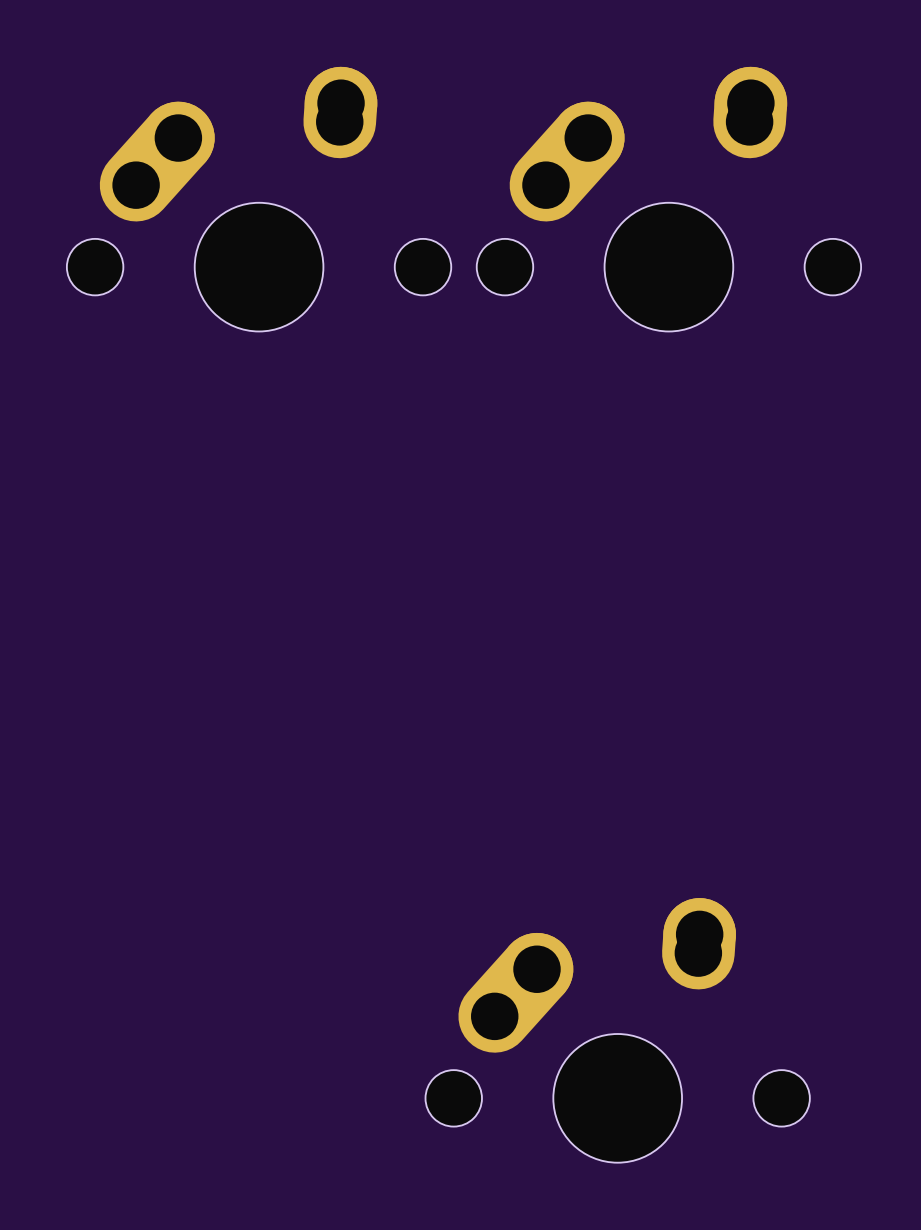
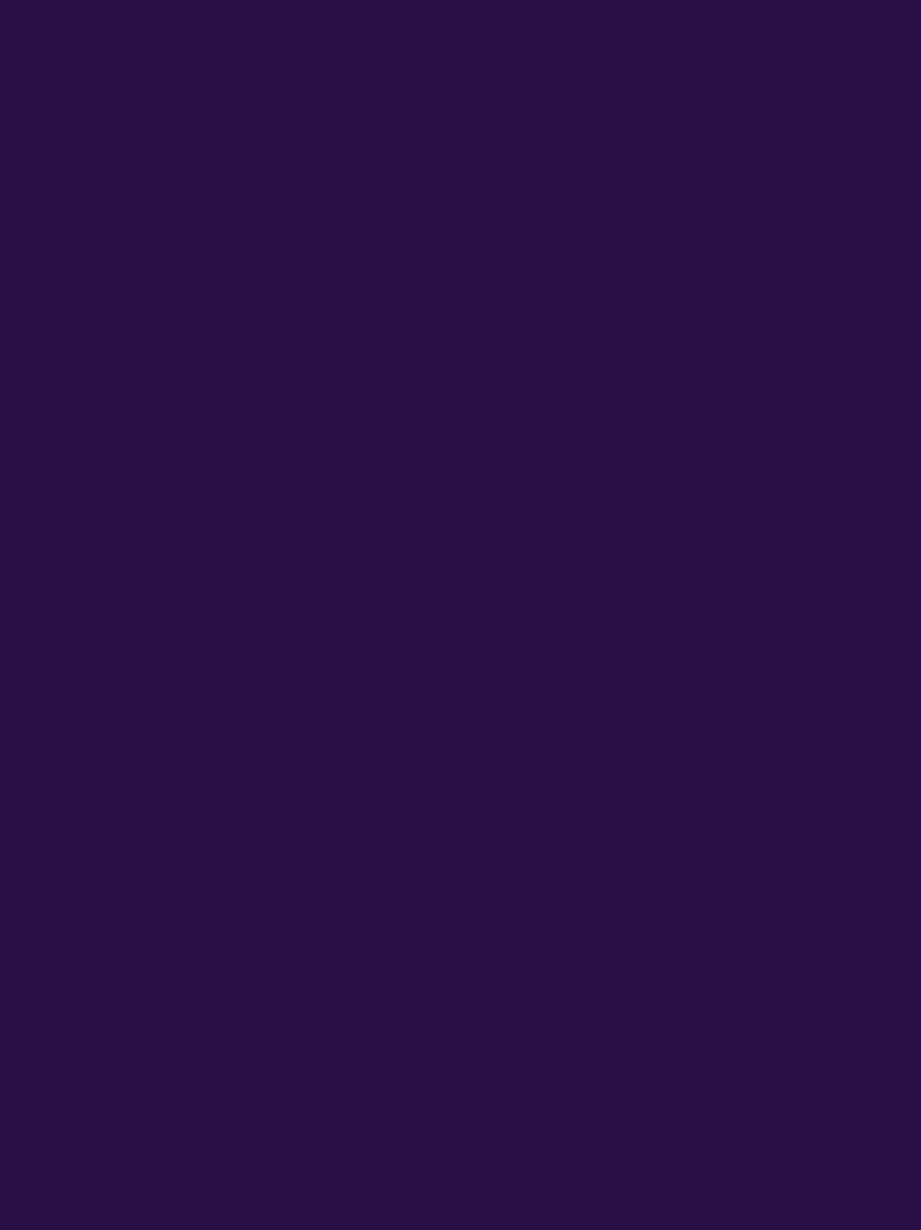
part: (259, 199) -> none
part: (668, 199) -> none
part: (617, 1030) -> none

